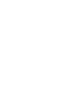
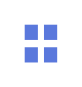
part: none -> (40, 32)
part: none -> (40, 54)

